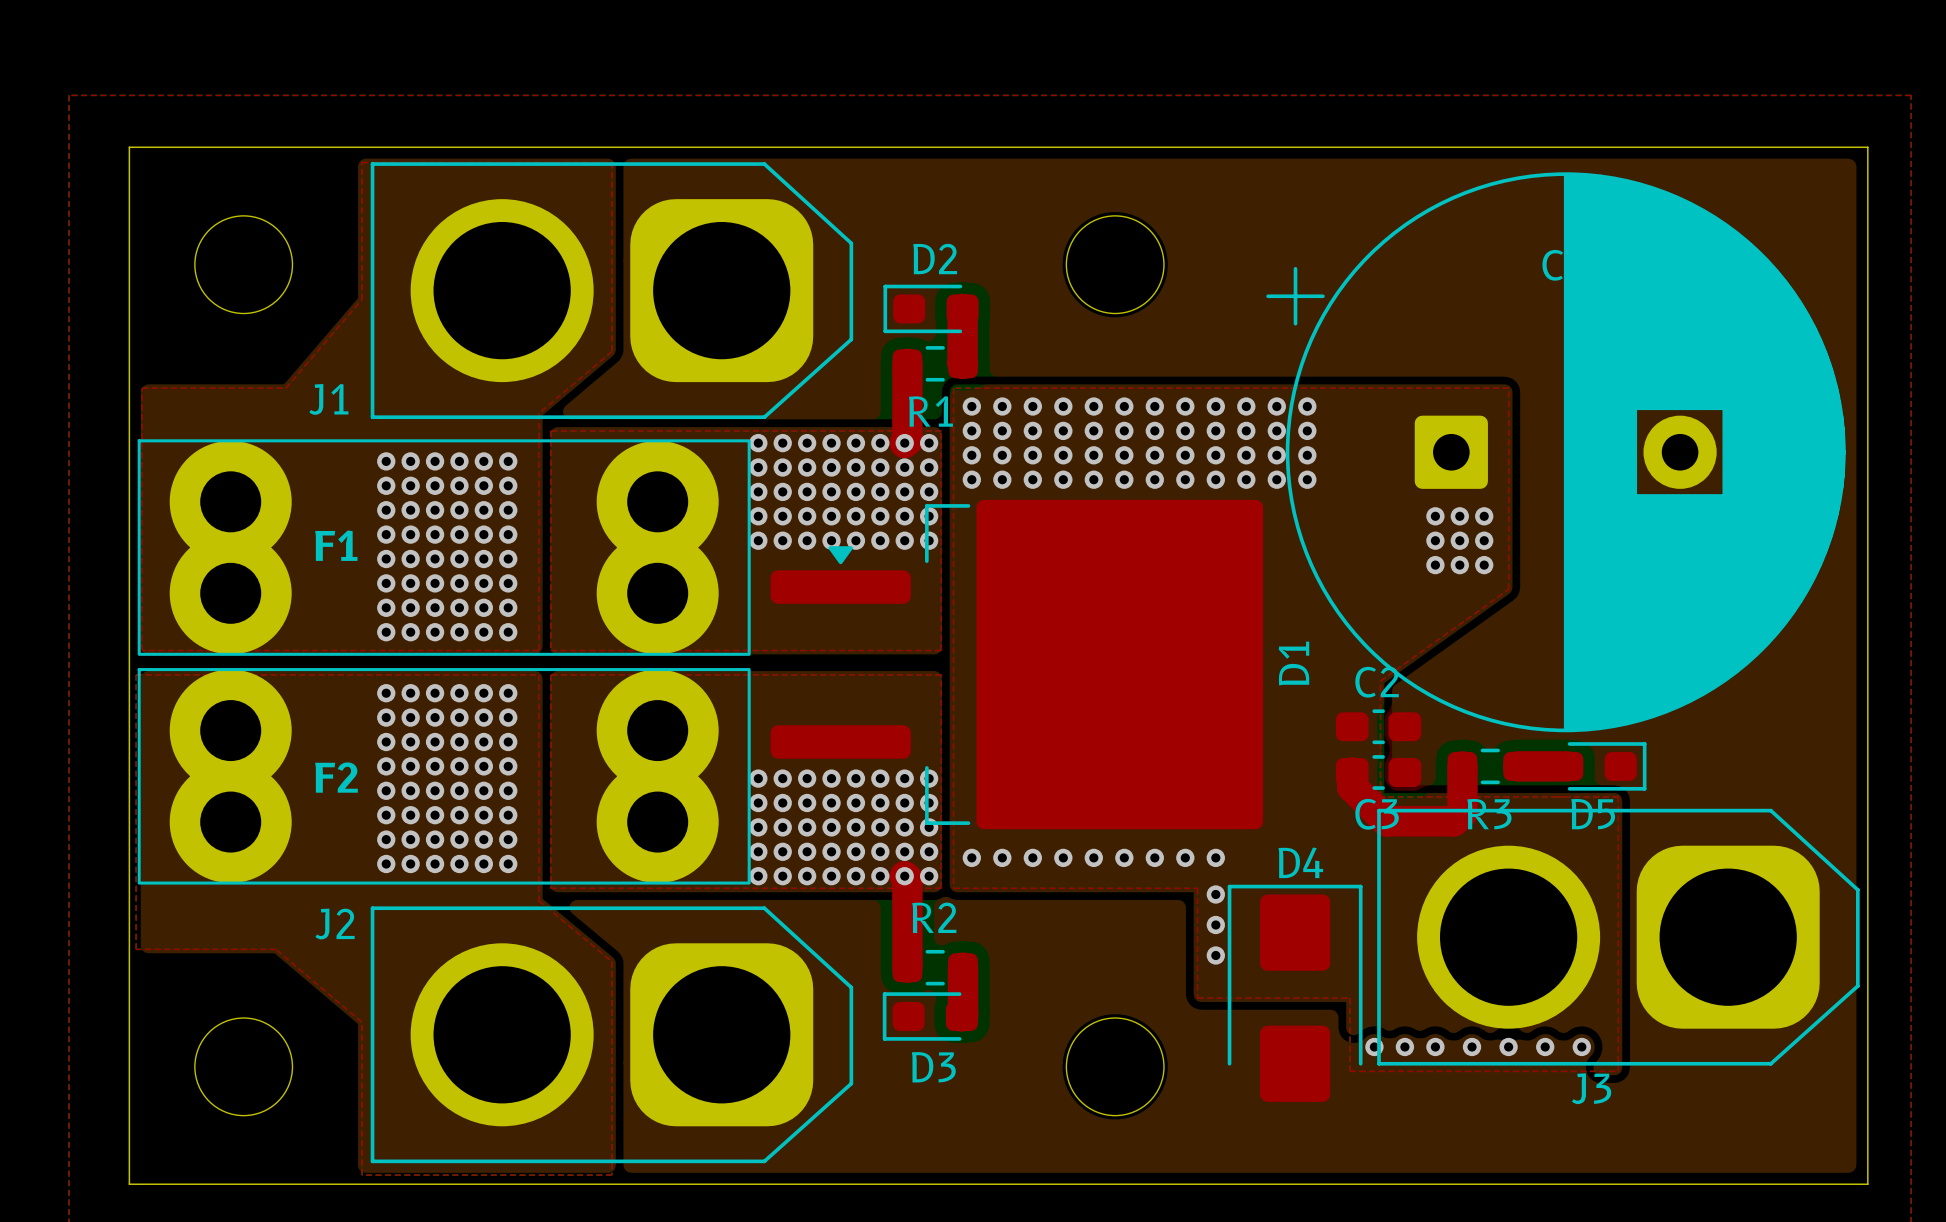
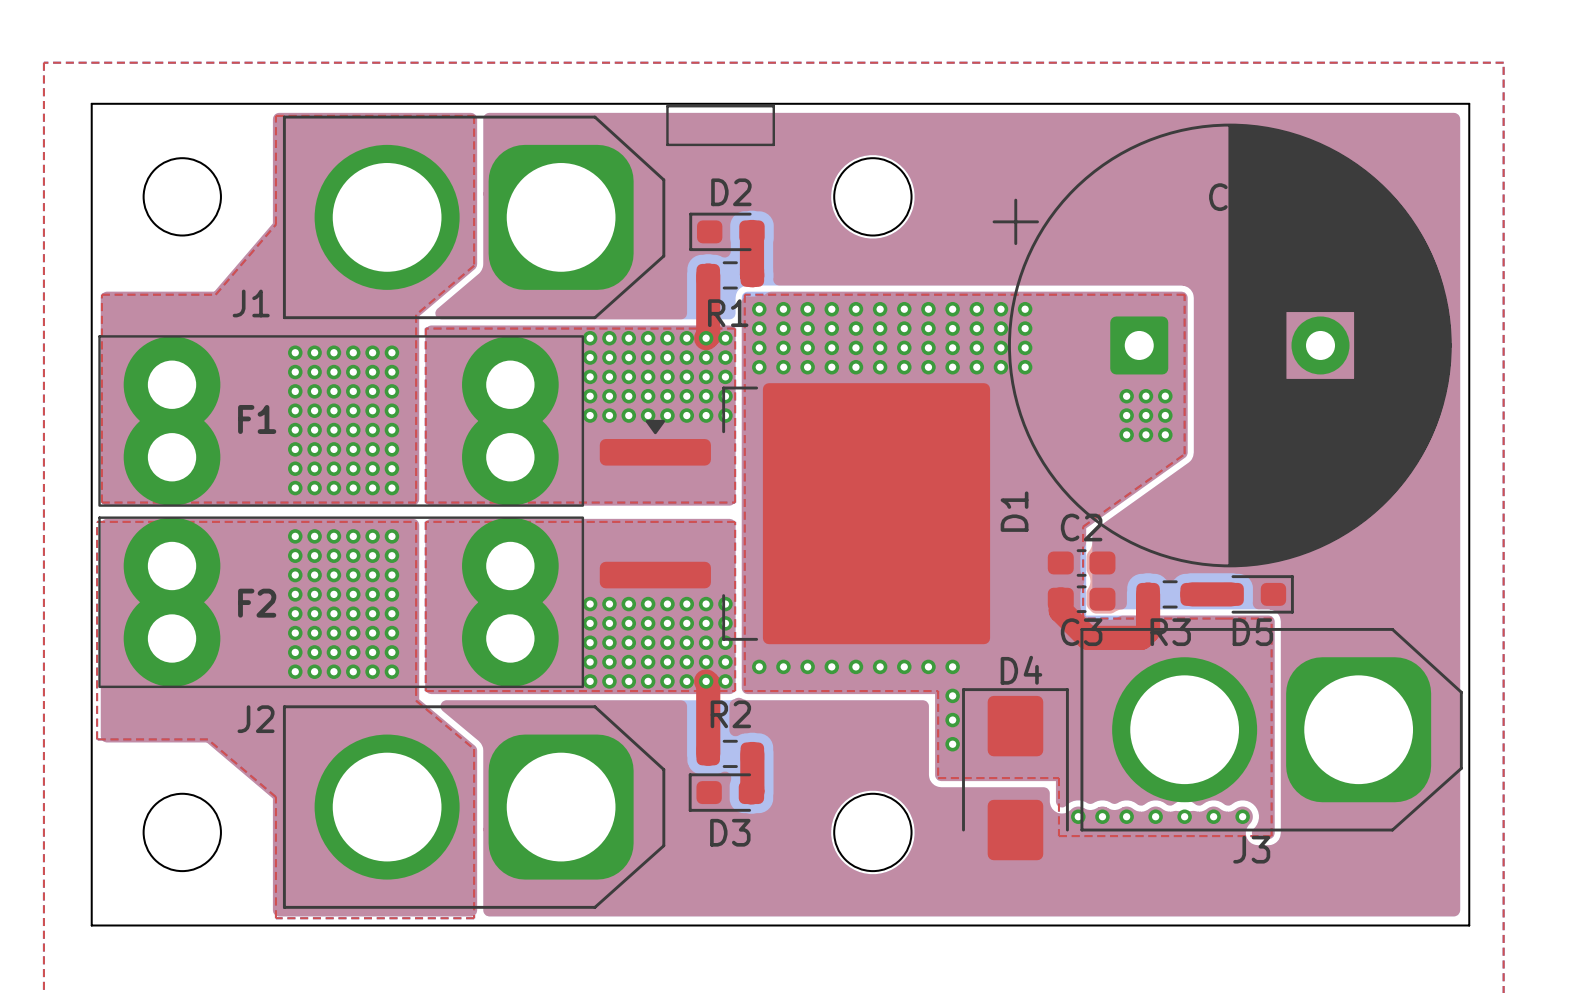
line: none -> (667, 106) (773, 106) (773, 144) (667, 144) (667, 106)

